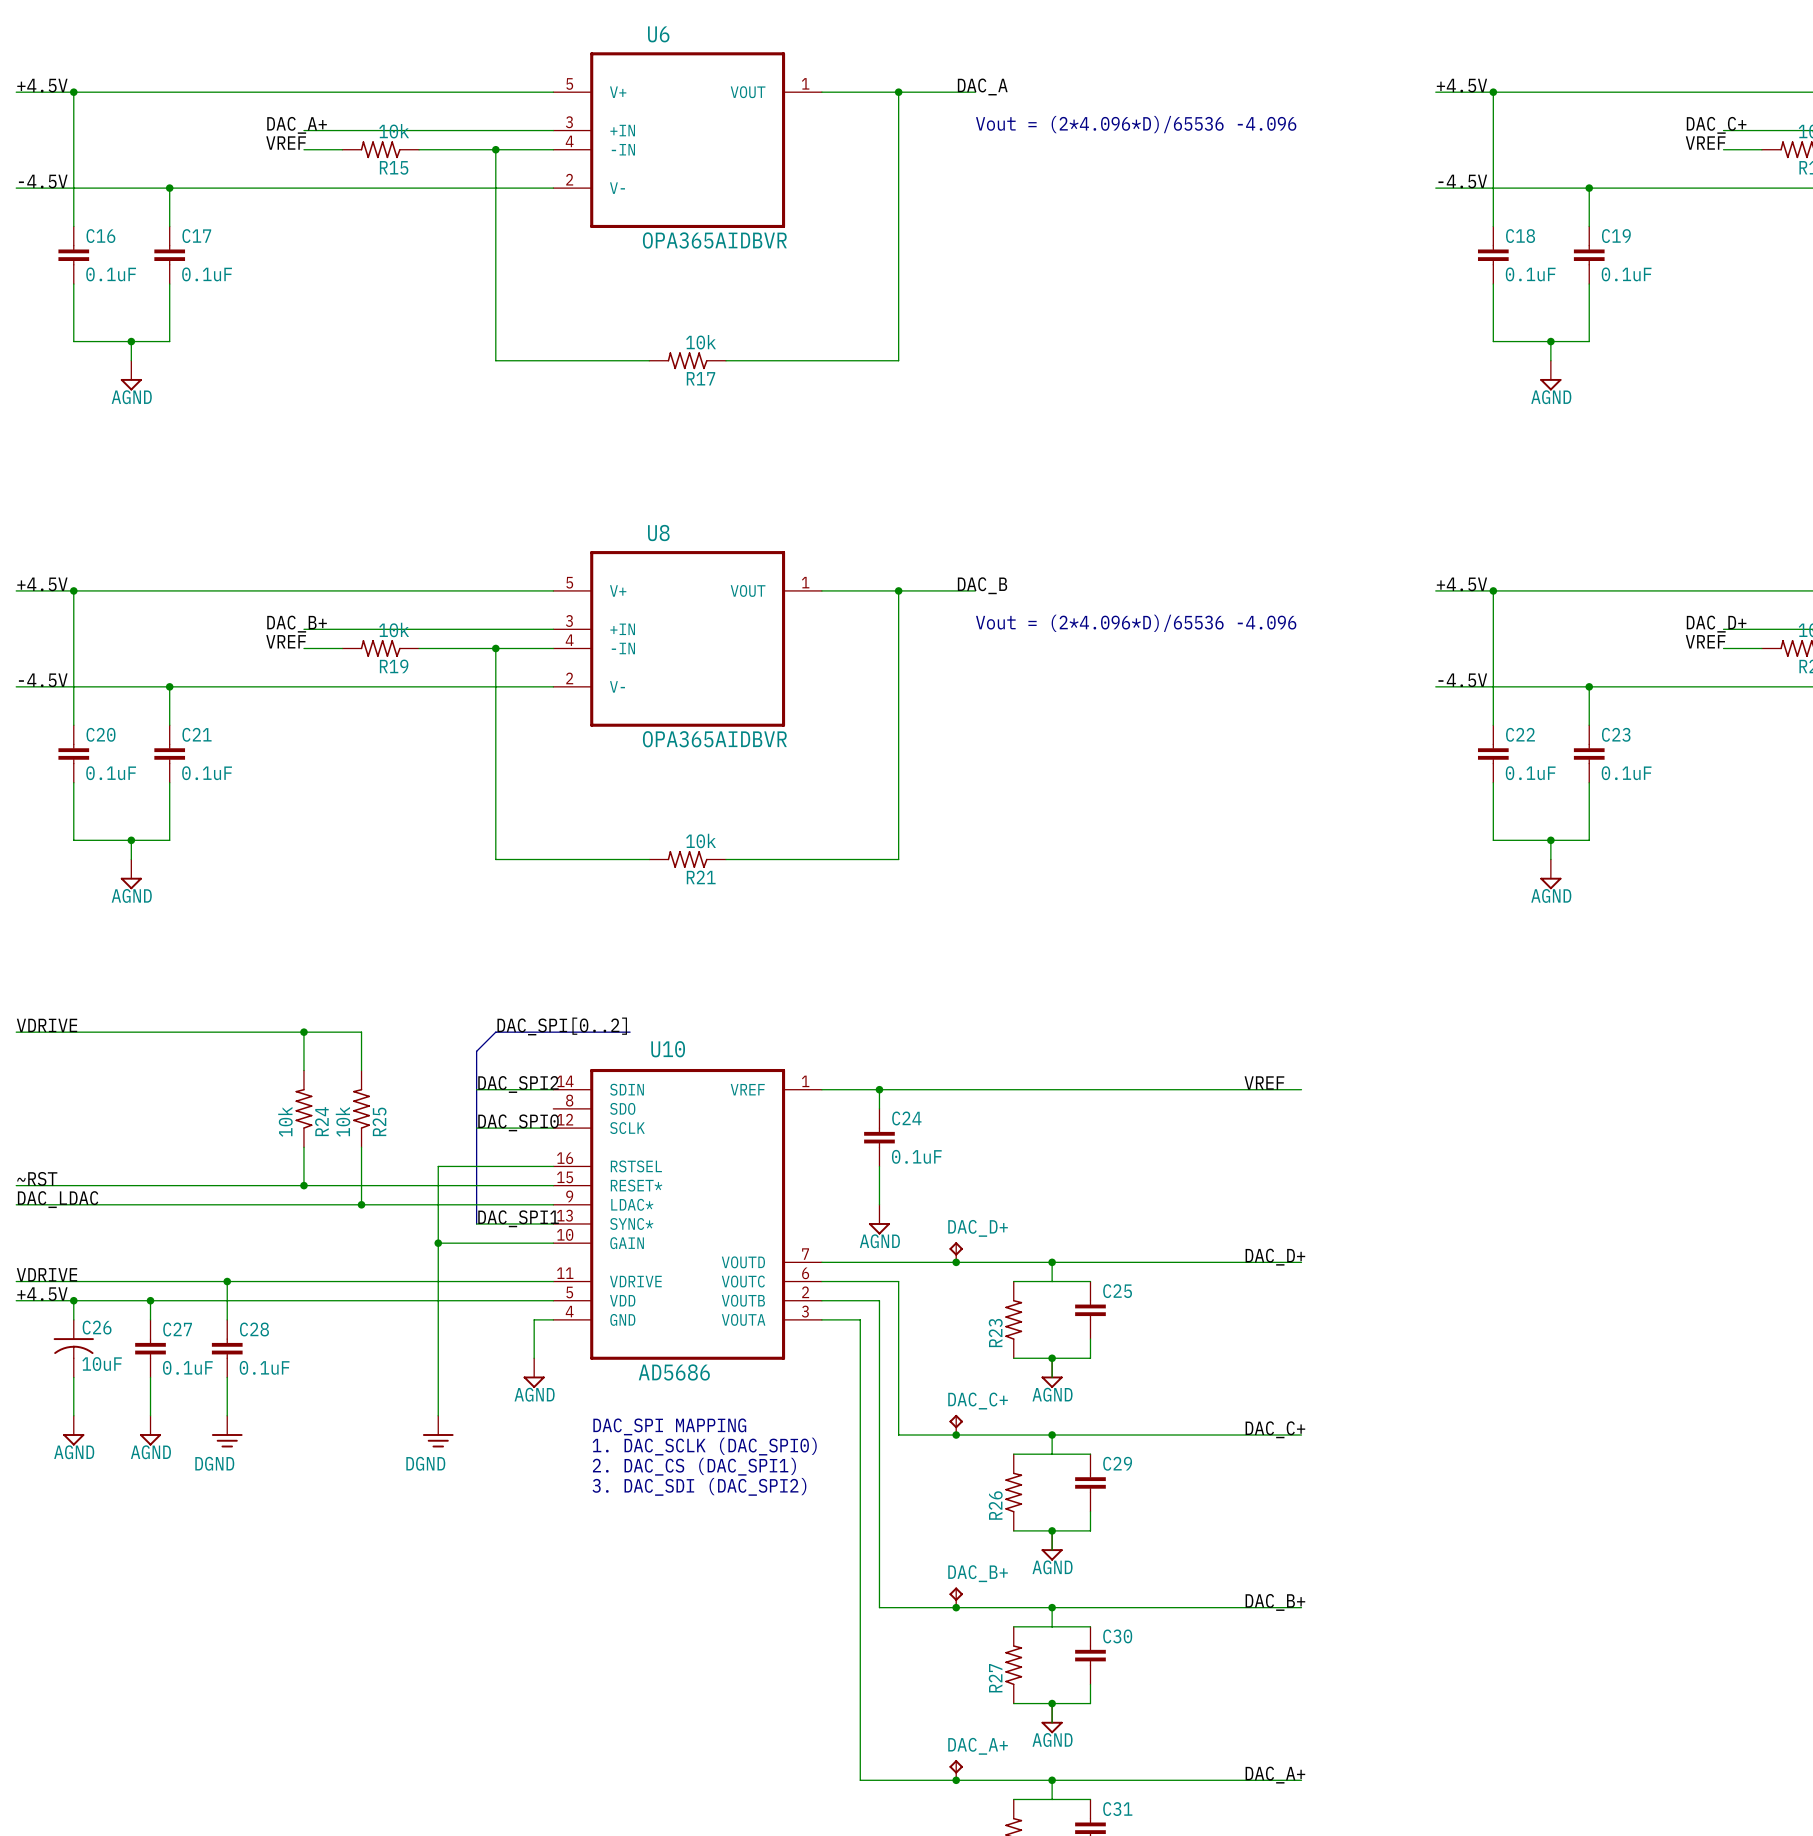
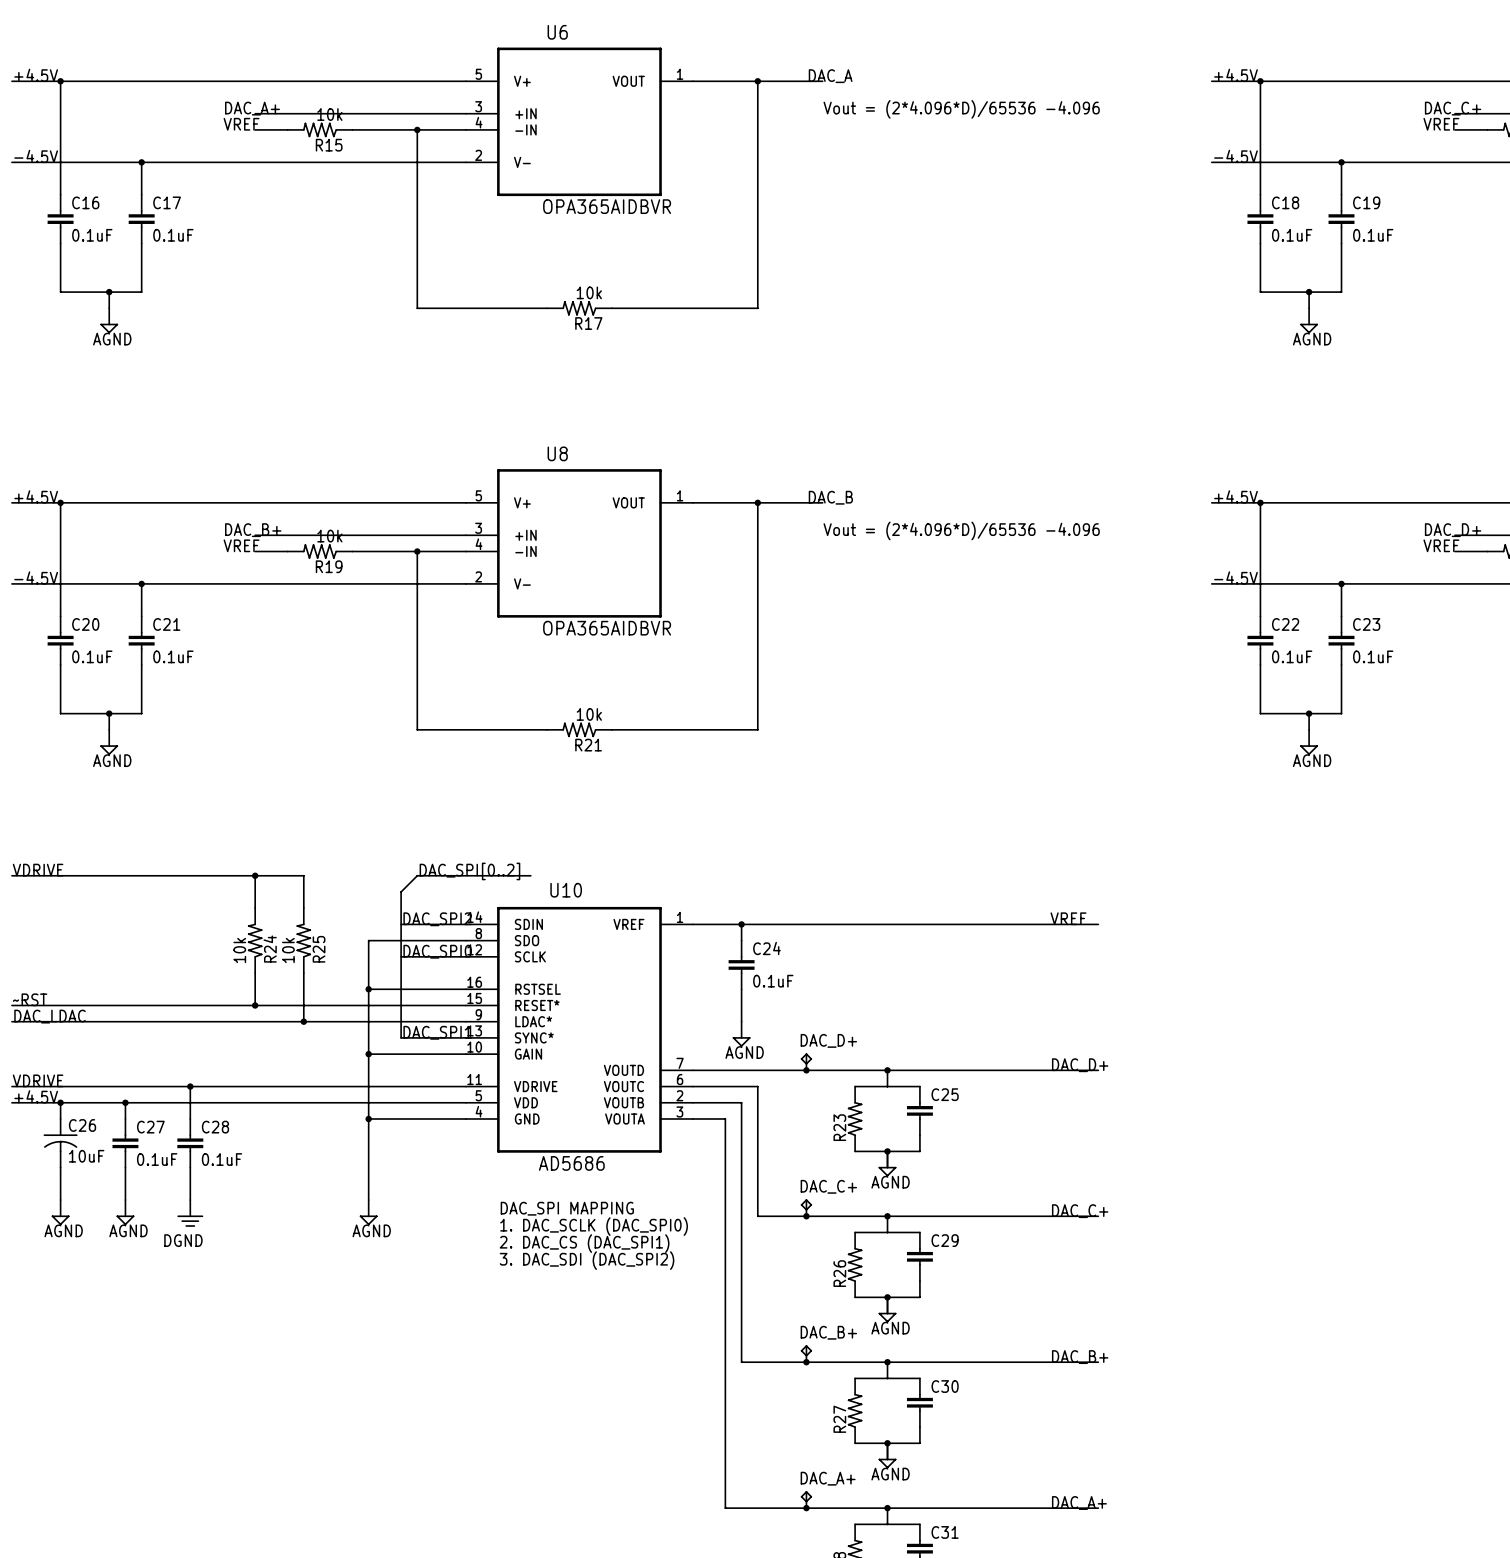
wire: none -> (465, 940) (368, 940) (368, 989)
junction: none -> (368, 989)
junction: none -> (368, 1118)
wire: (534, 1319) (534, 1358) -> (449, 1118) (368, 1118)
power symbol: AGND (534, 1373) -> none
power symbol: DGND (438, 1431) -> AGND (368, 1212)

